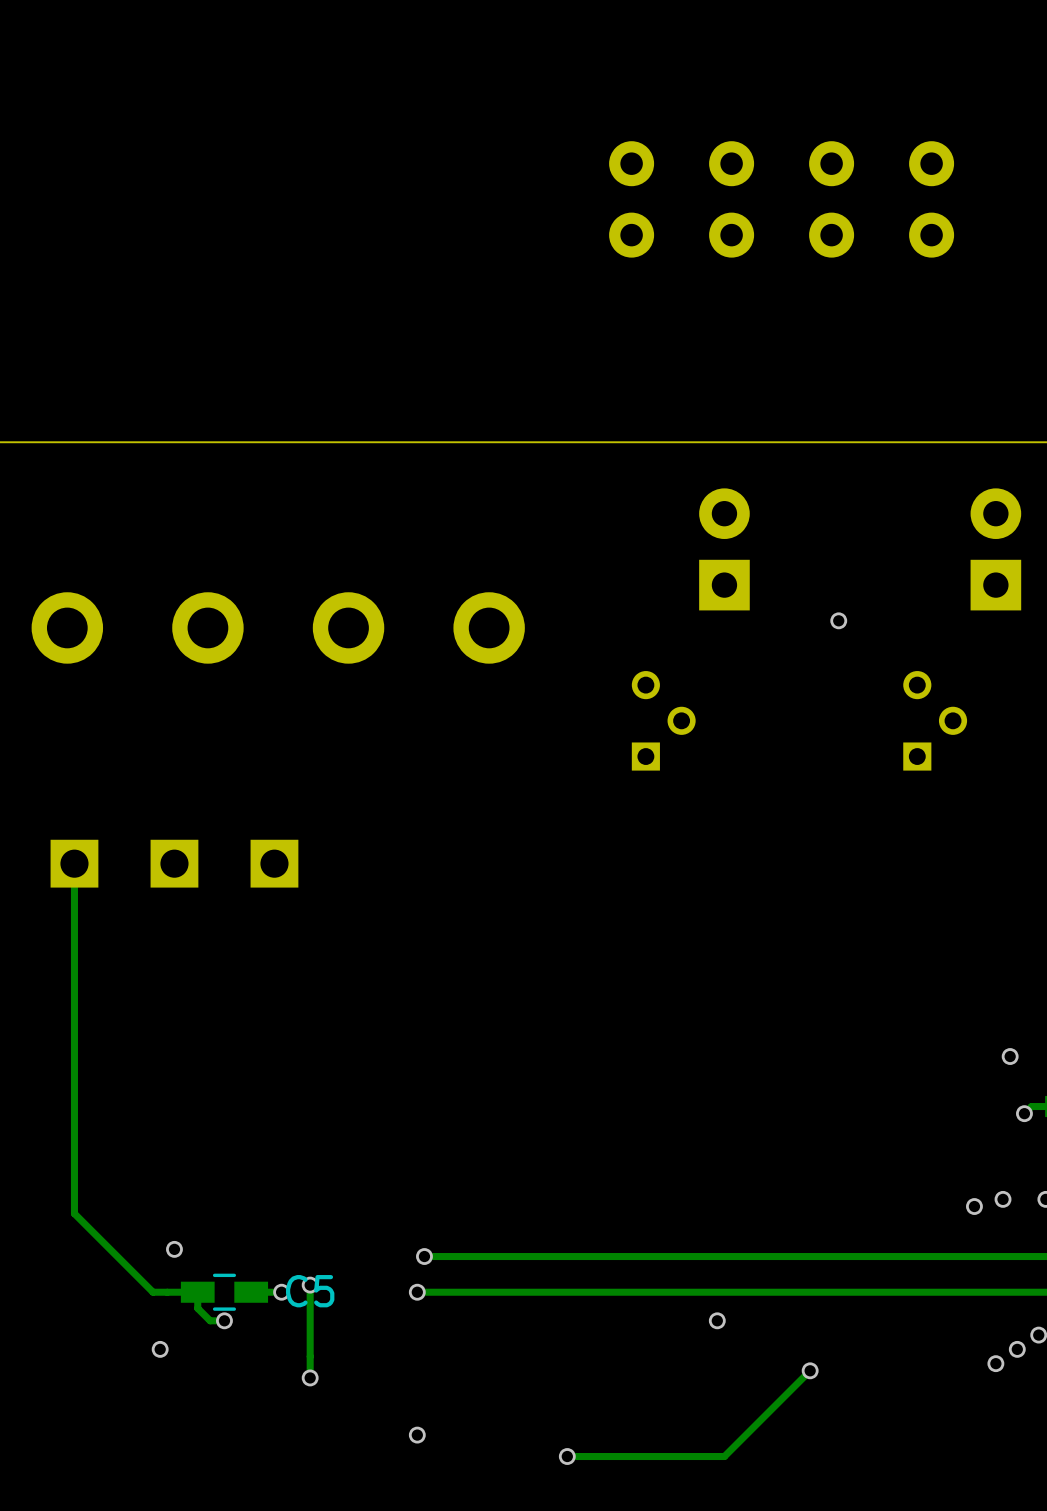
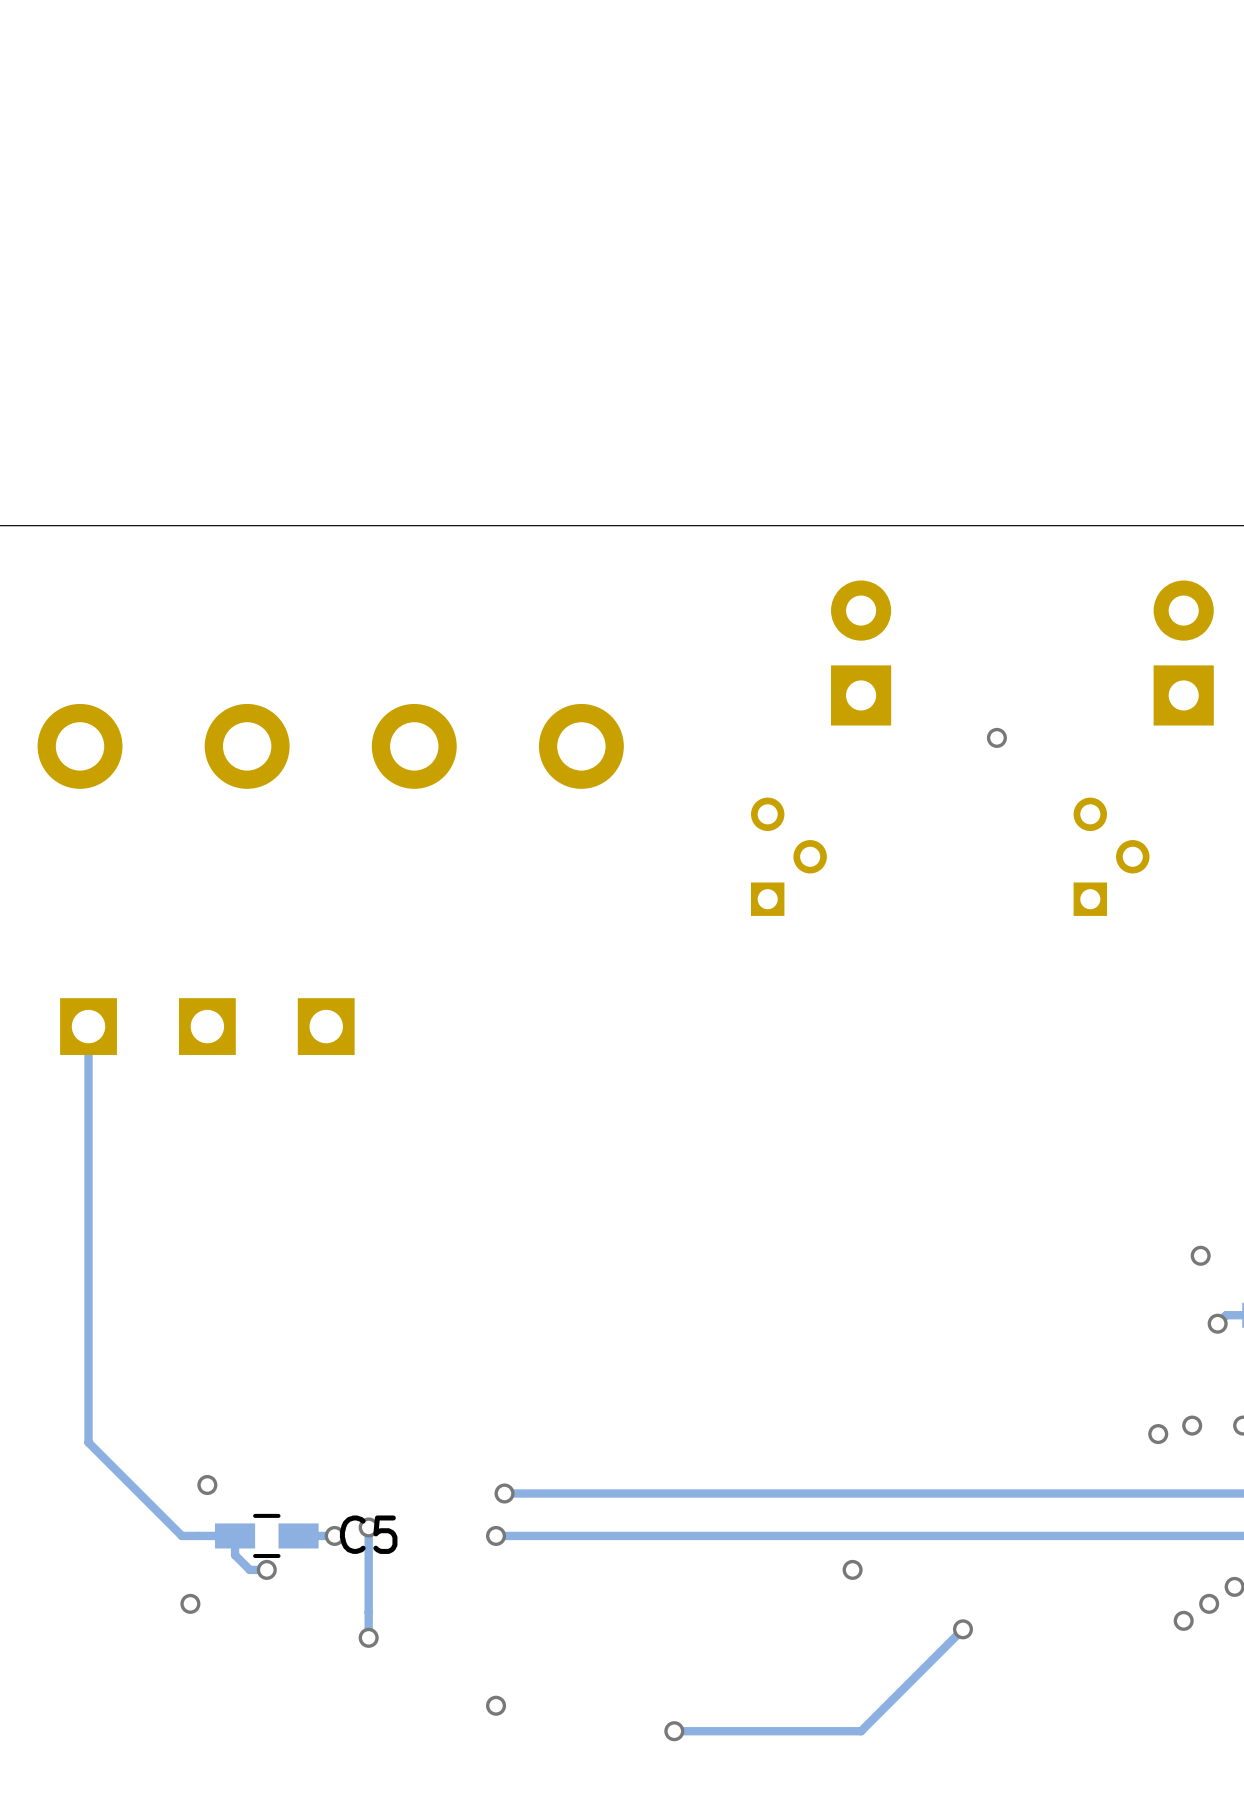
part: (631, 199) -> none
part: (731, 199) -> none
part: (831, 199) -> none
part: (931, 199) -> none

